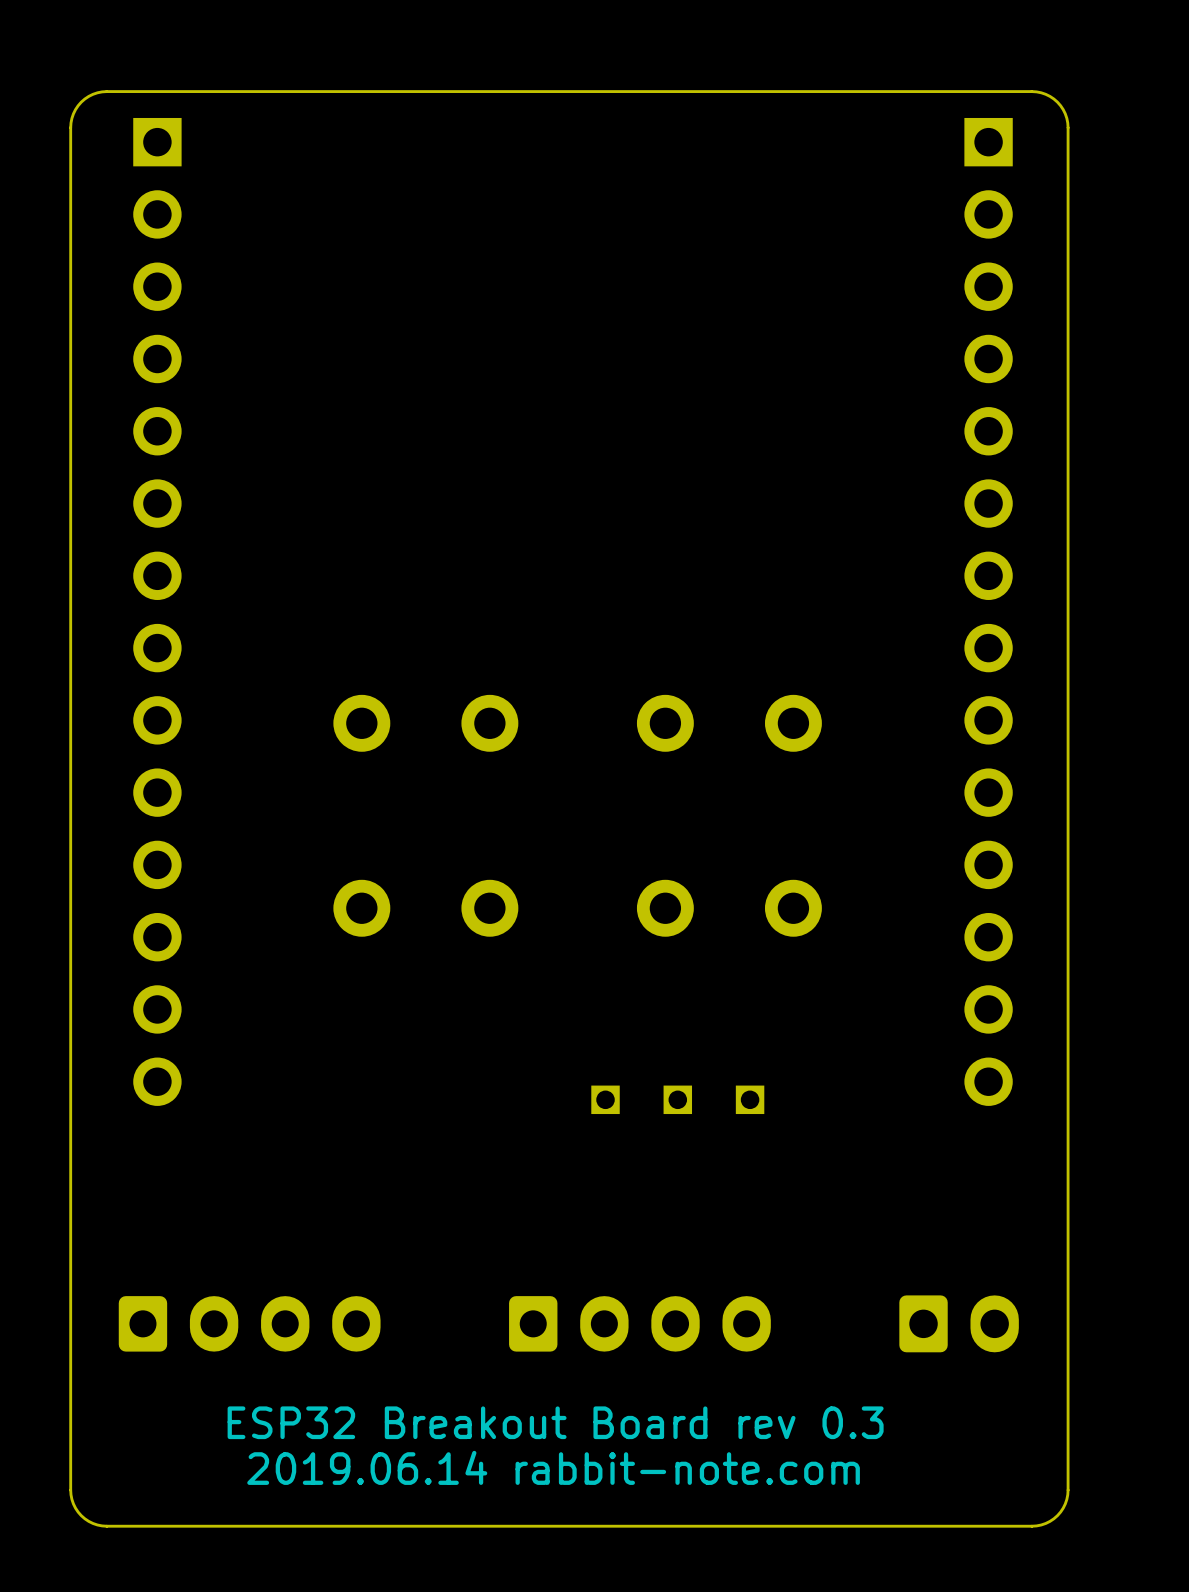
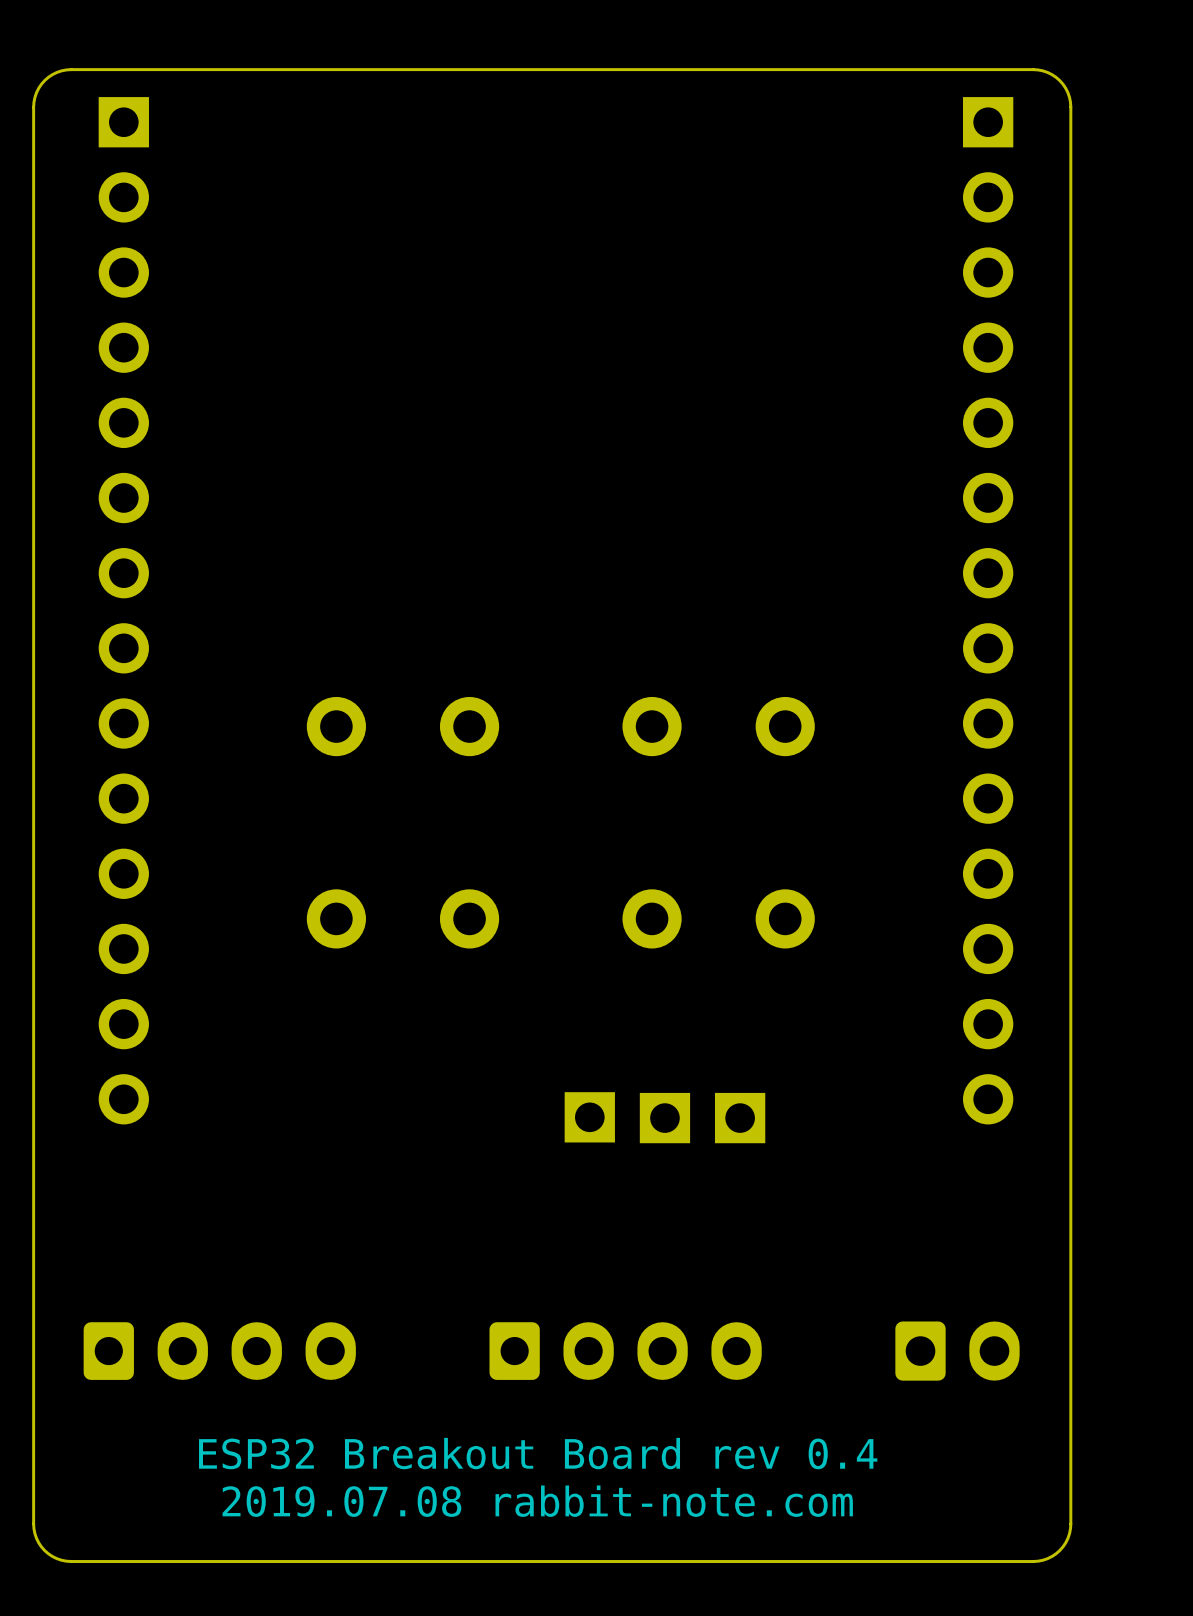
part footprint: [591, 1085, 620, 1115] -> [564, 1092, 615, 1143]
part footprint: [663, 1085, 693, 1115] -> [639, 1092, 691, 1144]
part footprint: [735, 1085, 765, 1115] -> [714, 1092, 766, 1144]
text: ESP32 Breakout Board rev 0.3 (555, 1422) -> ESP32 Breakout Board rev 0.4 (538, 1453)
text: 2019.06.14 rabbit-note.com (553, 1467) -> 2019.07.08 rabbit-note.com (537, 1501)

